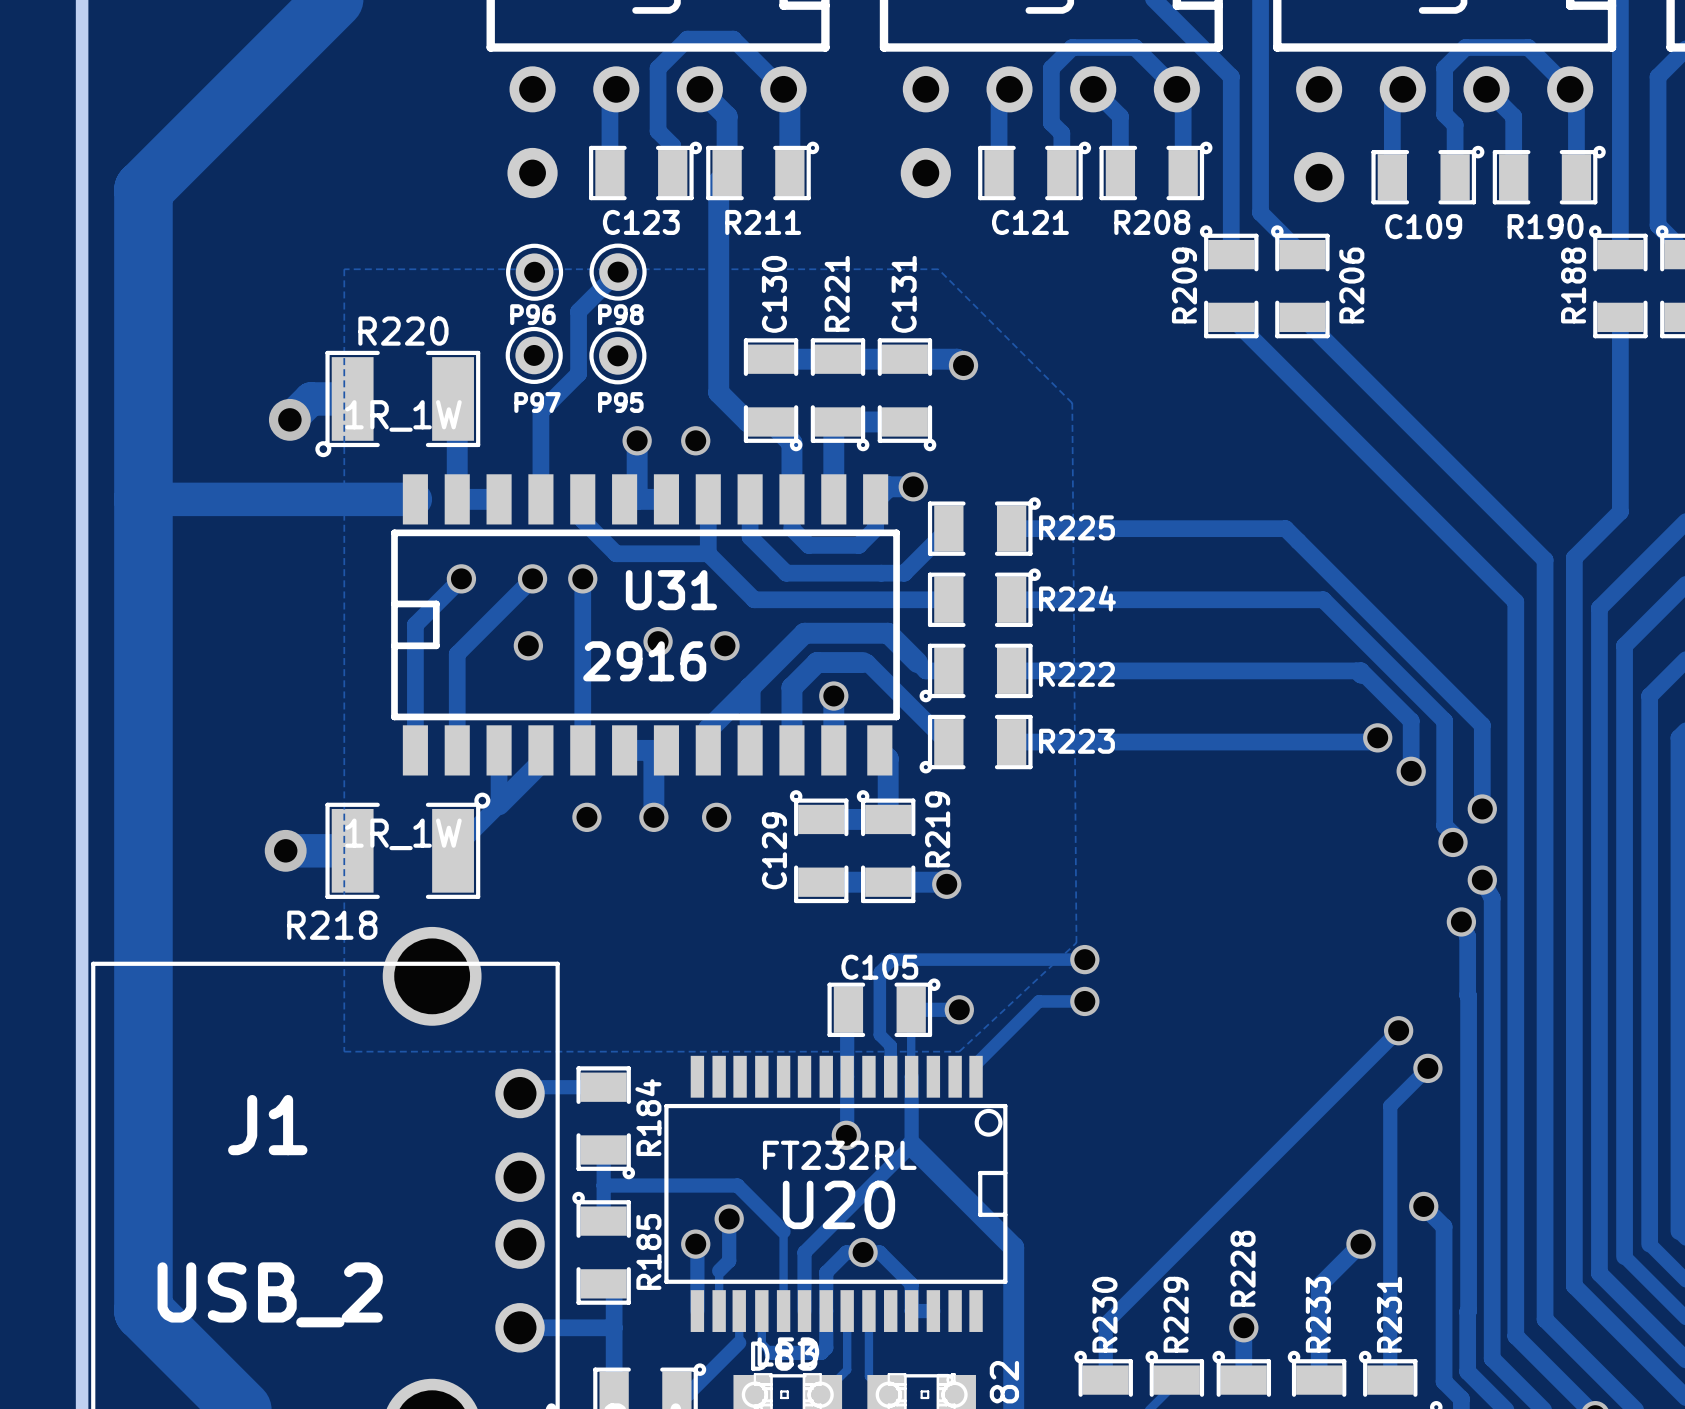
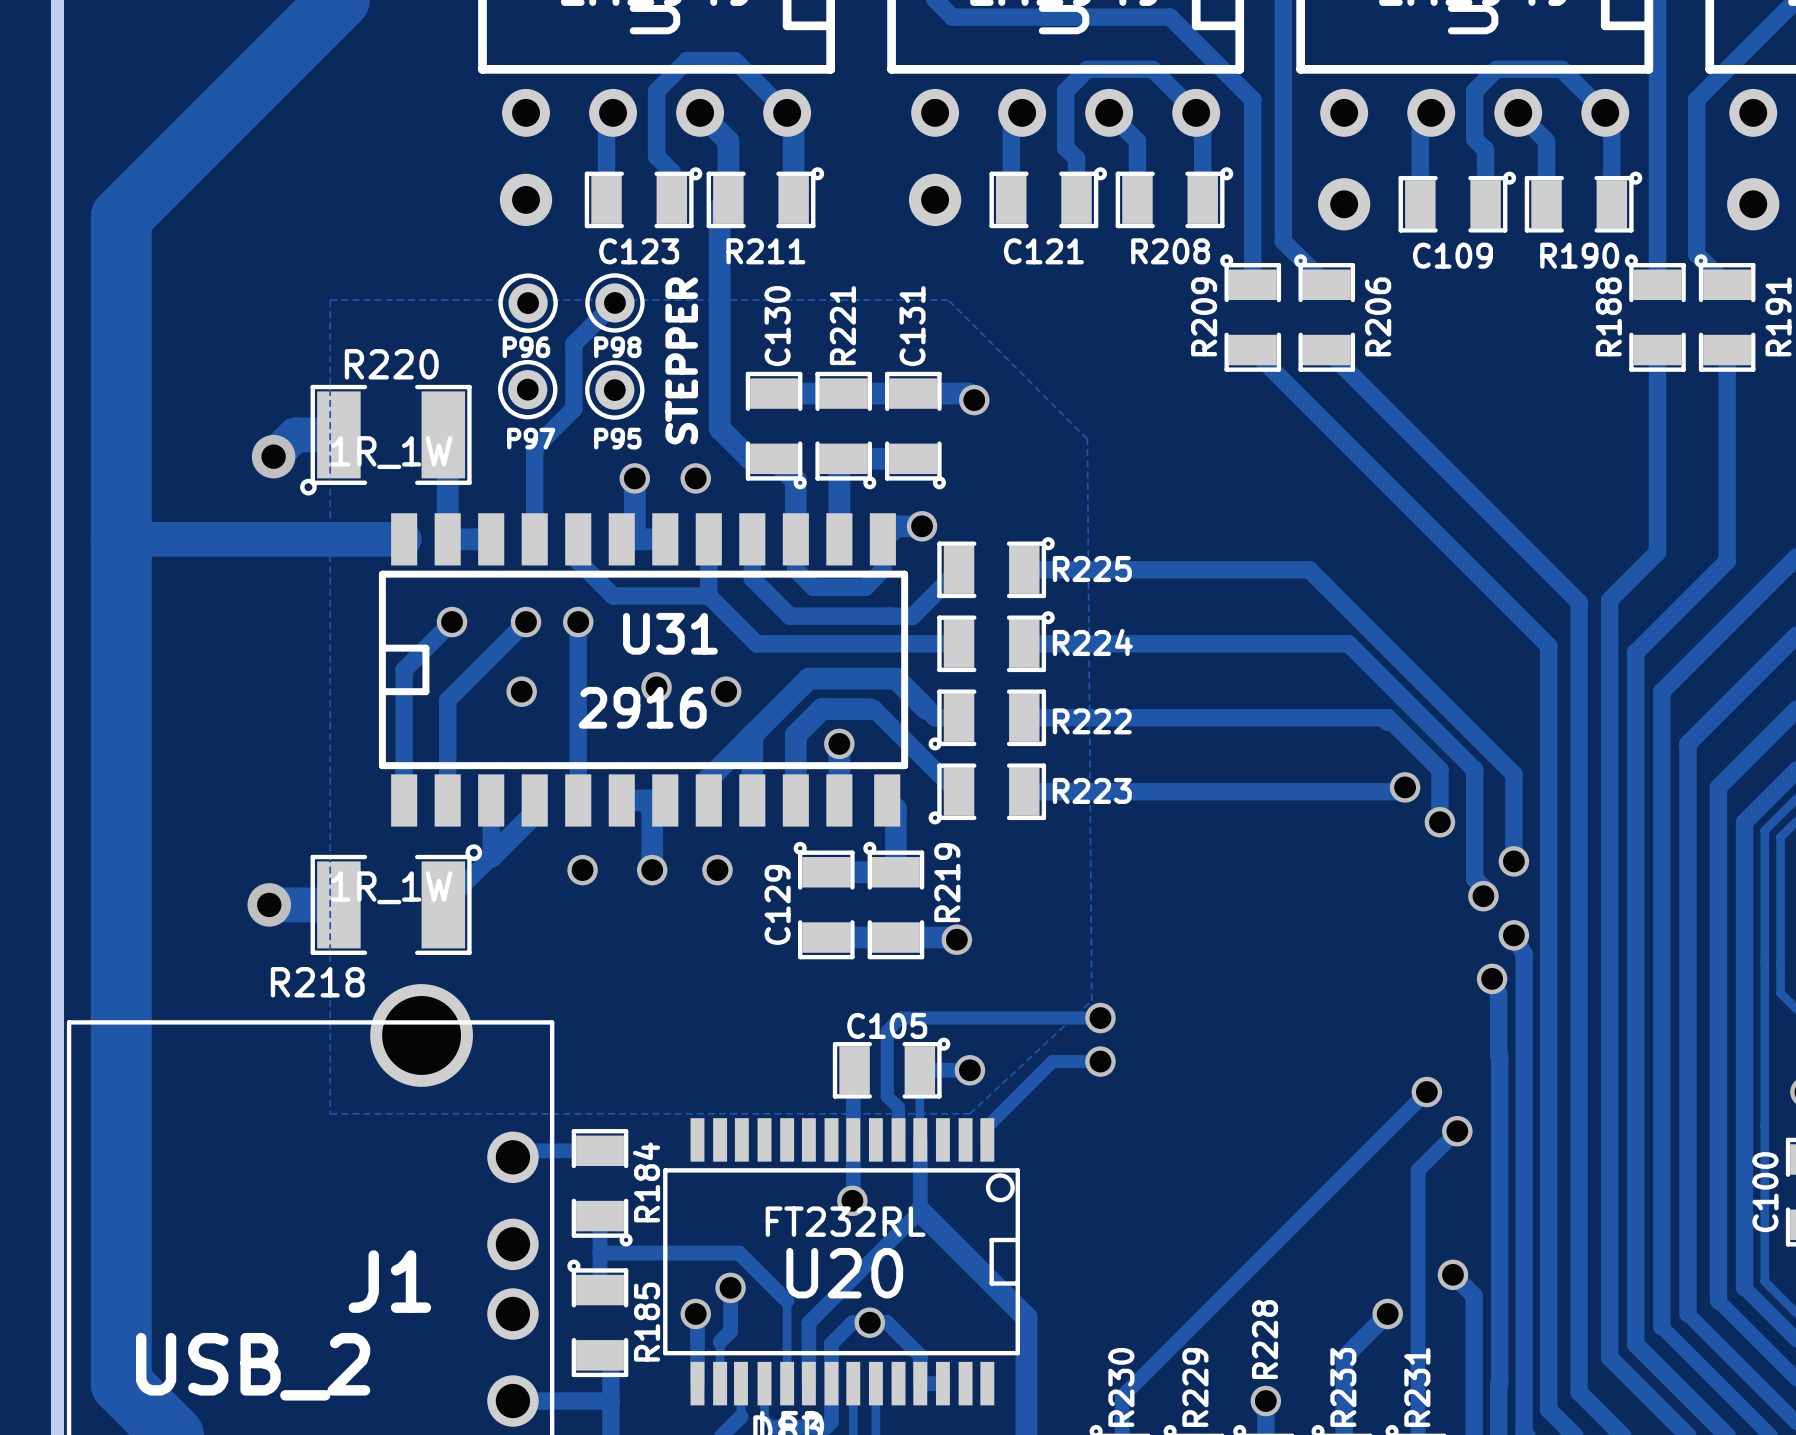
text: none -> STEPPER (681, 360)
J1 name position: J1 (267, 1125) -> J1 (389, 1281)

